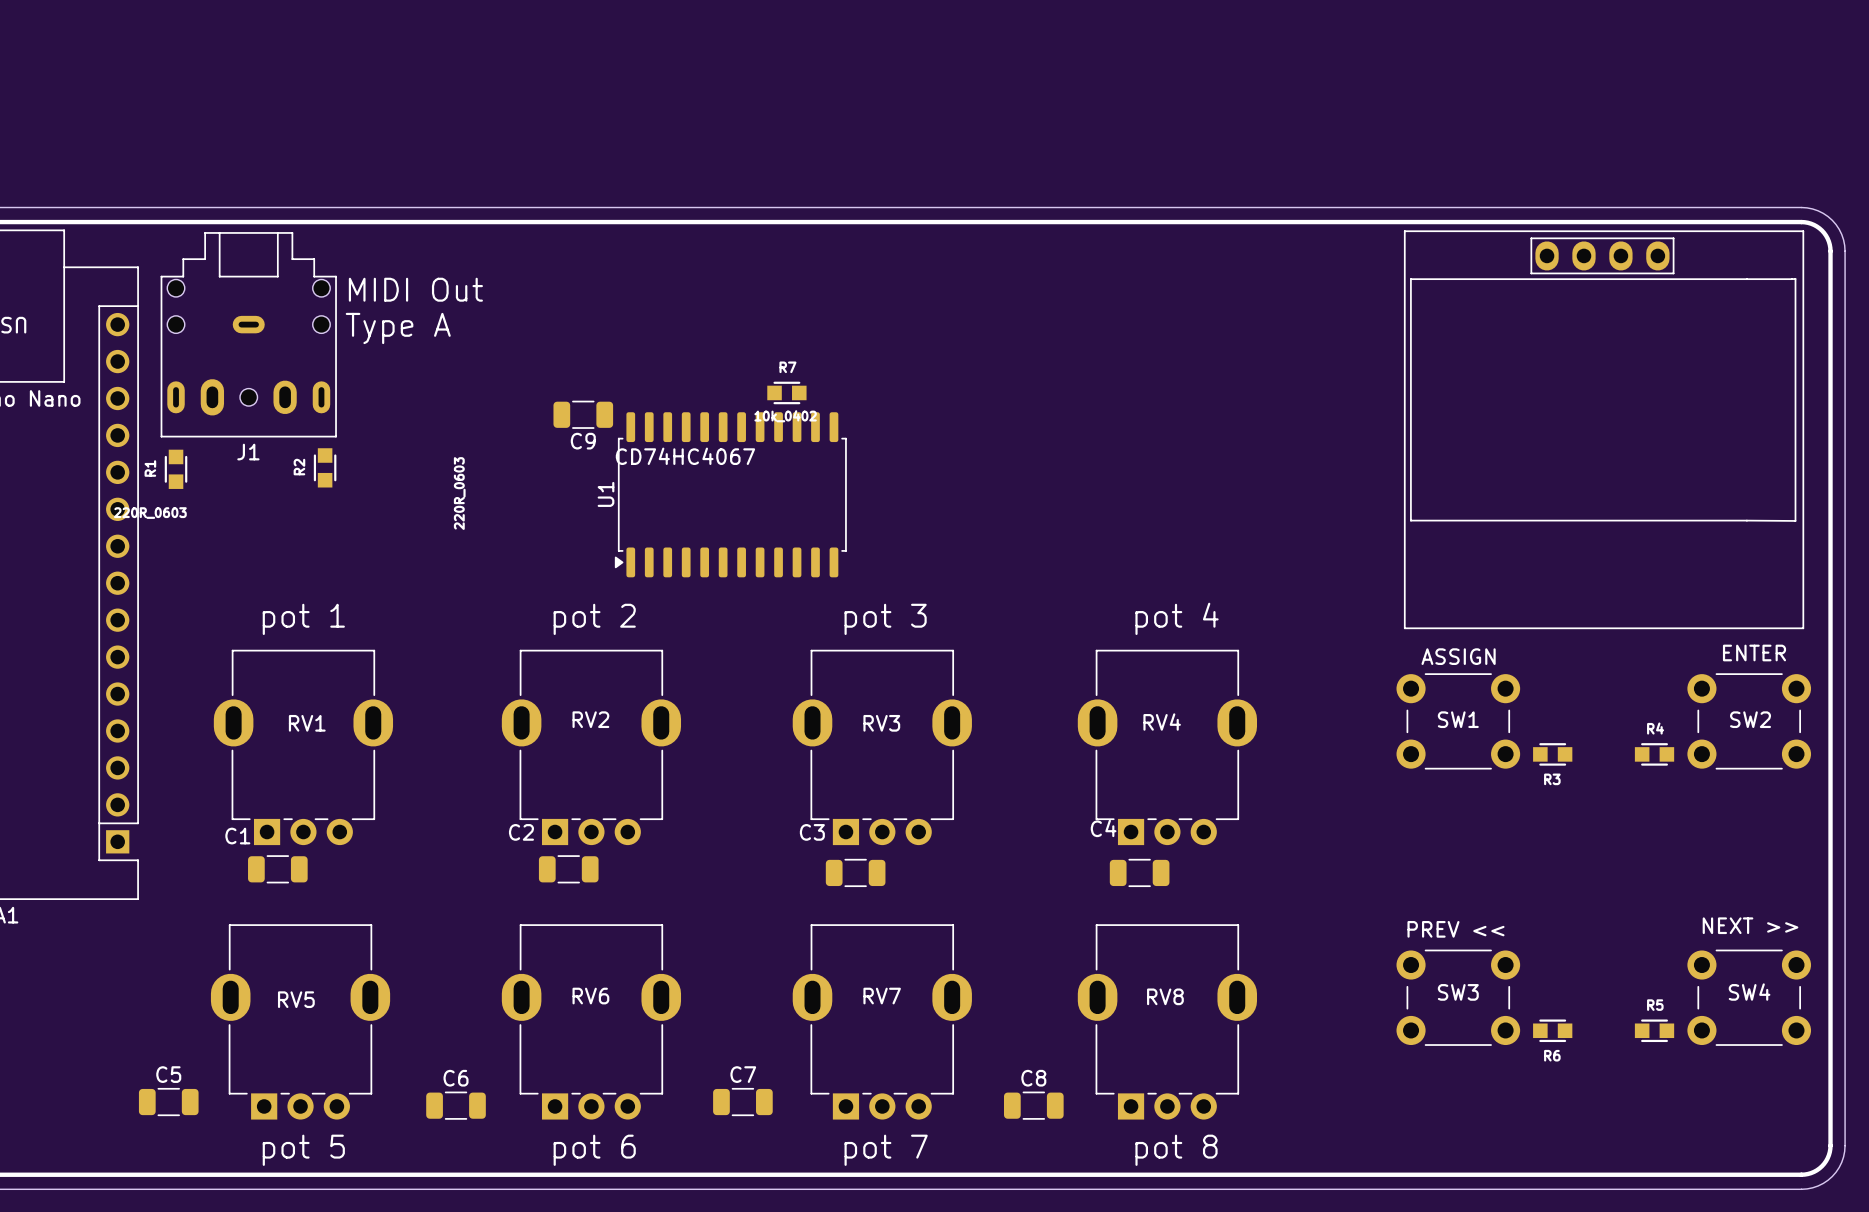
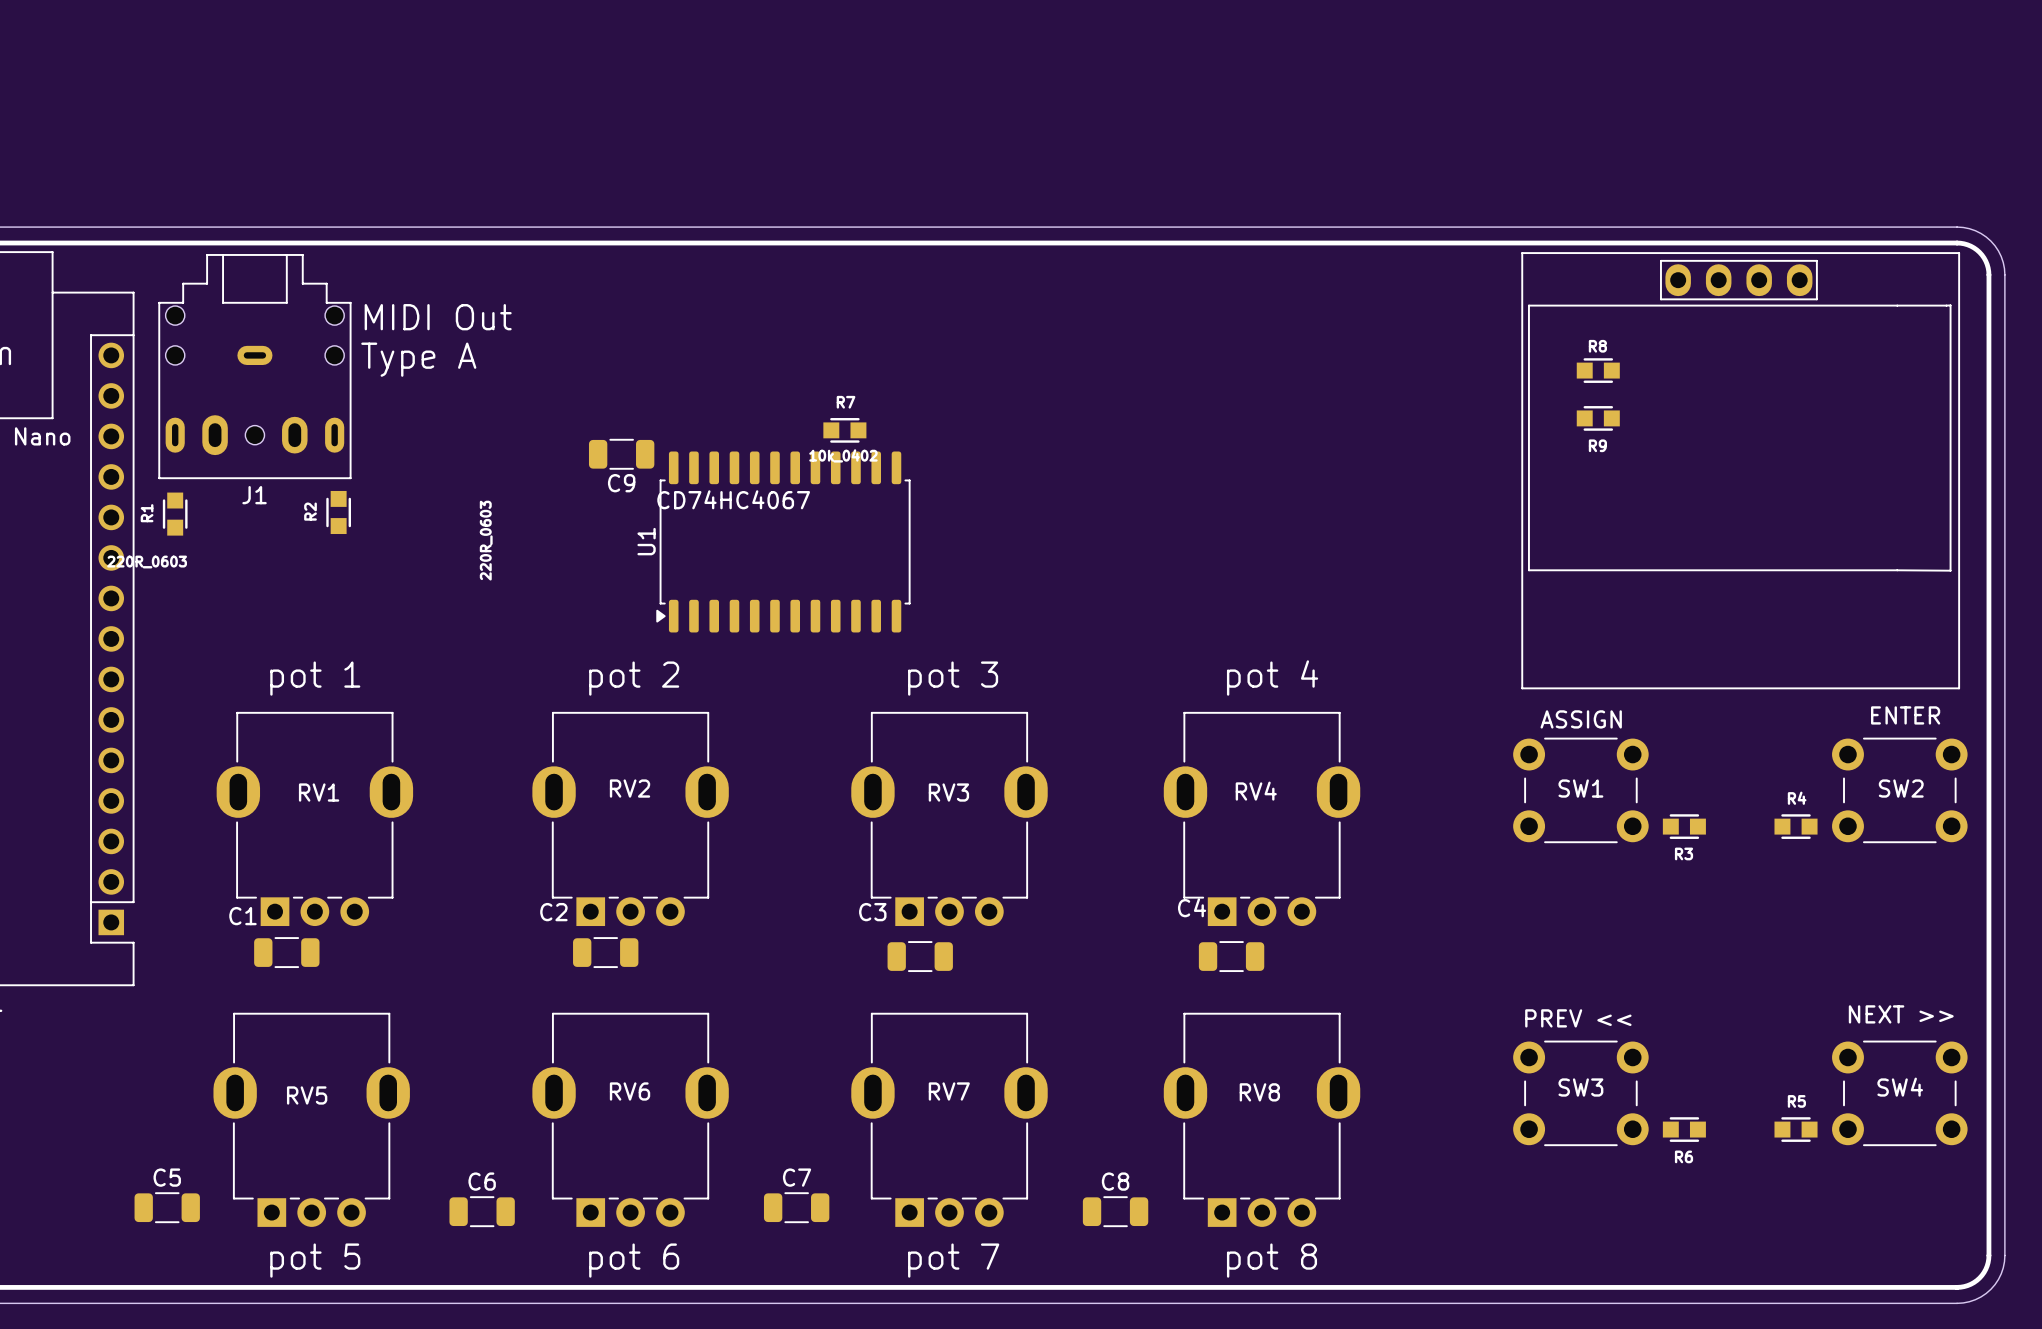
R8: none -> (1598, 370)
R9: none -> (1598, 418)

